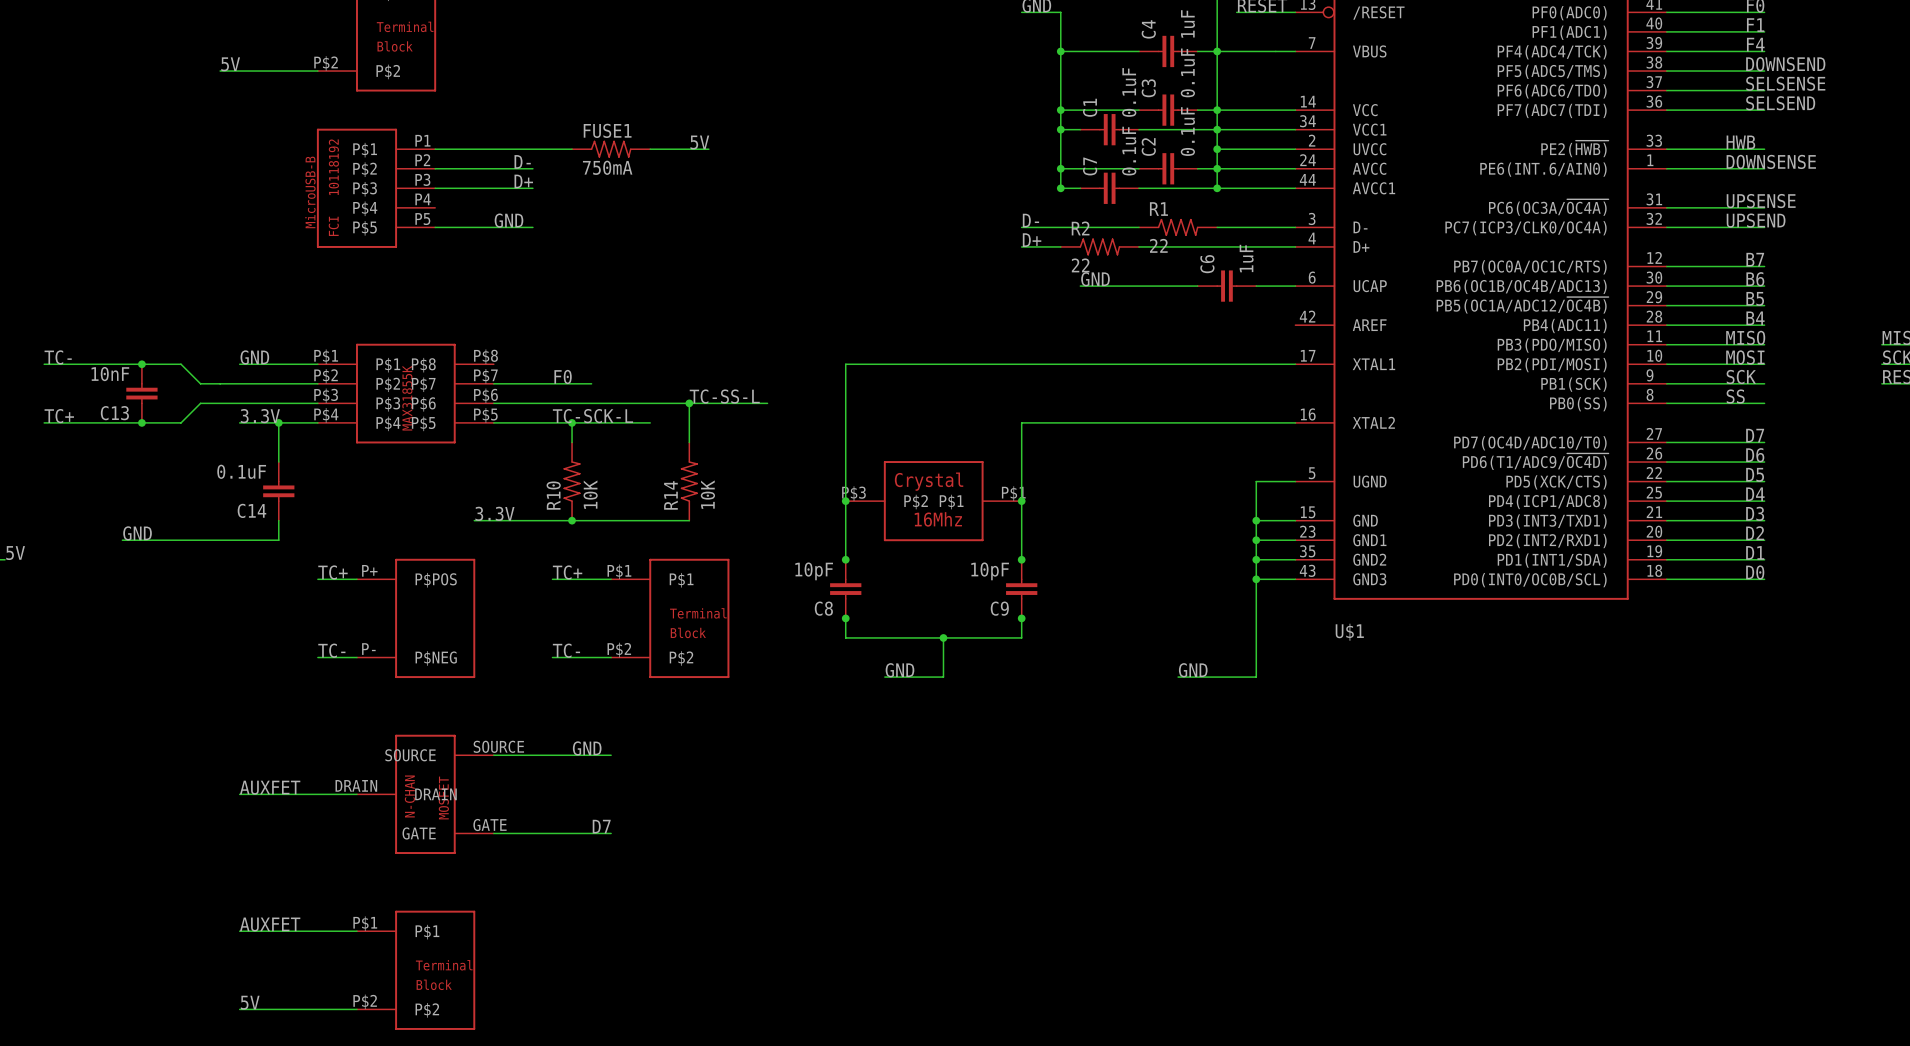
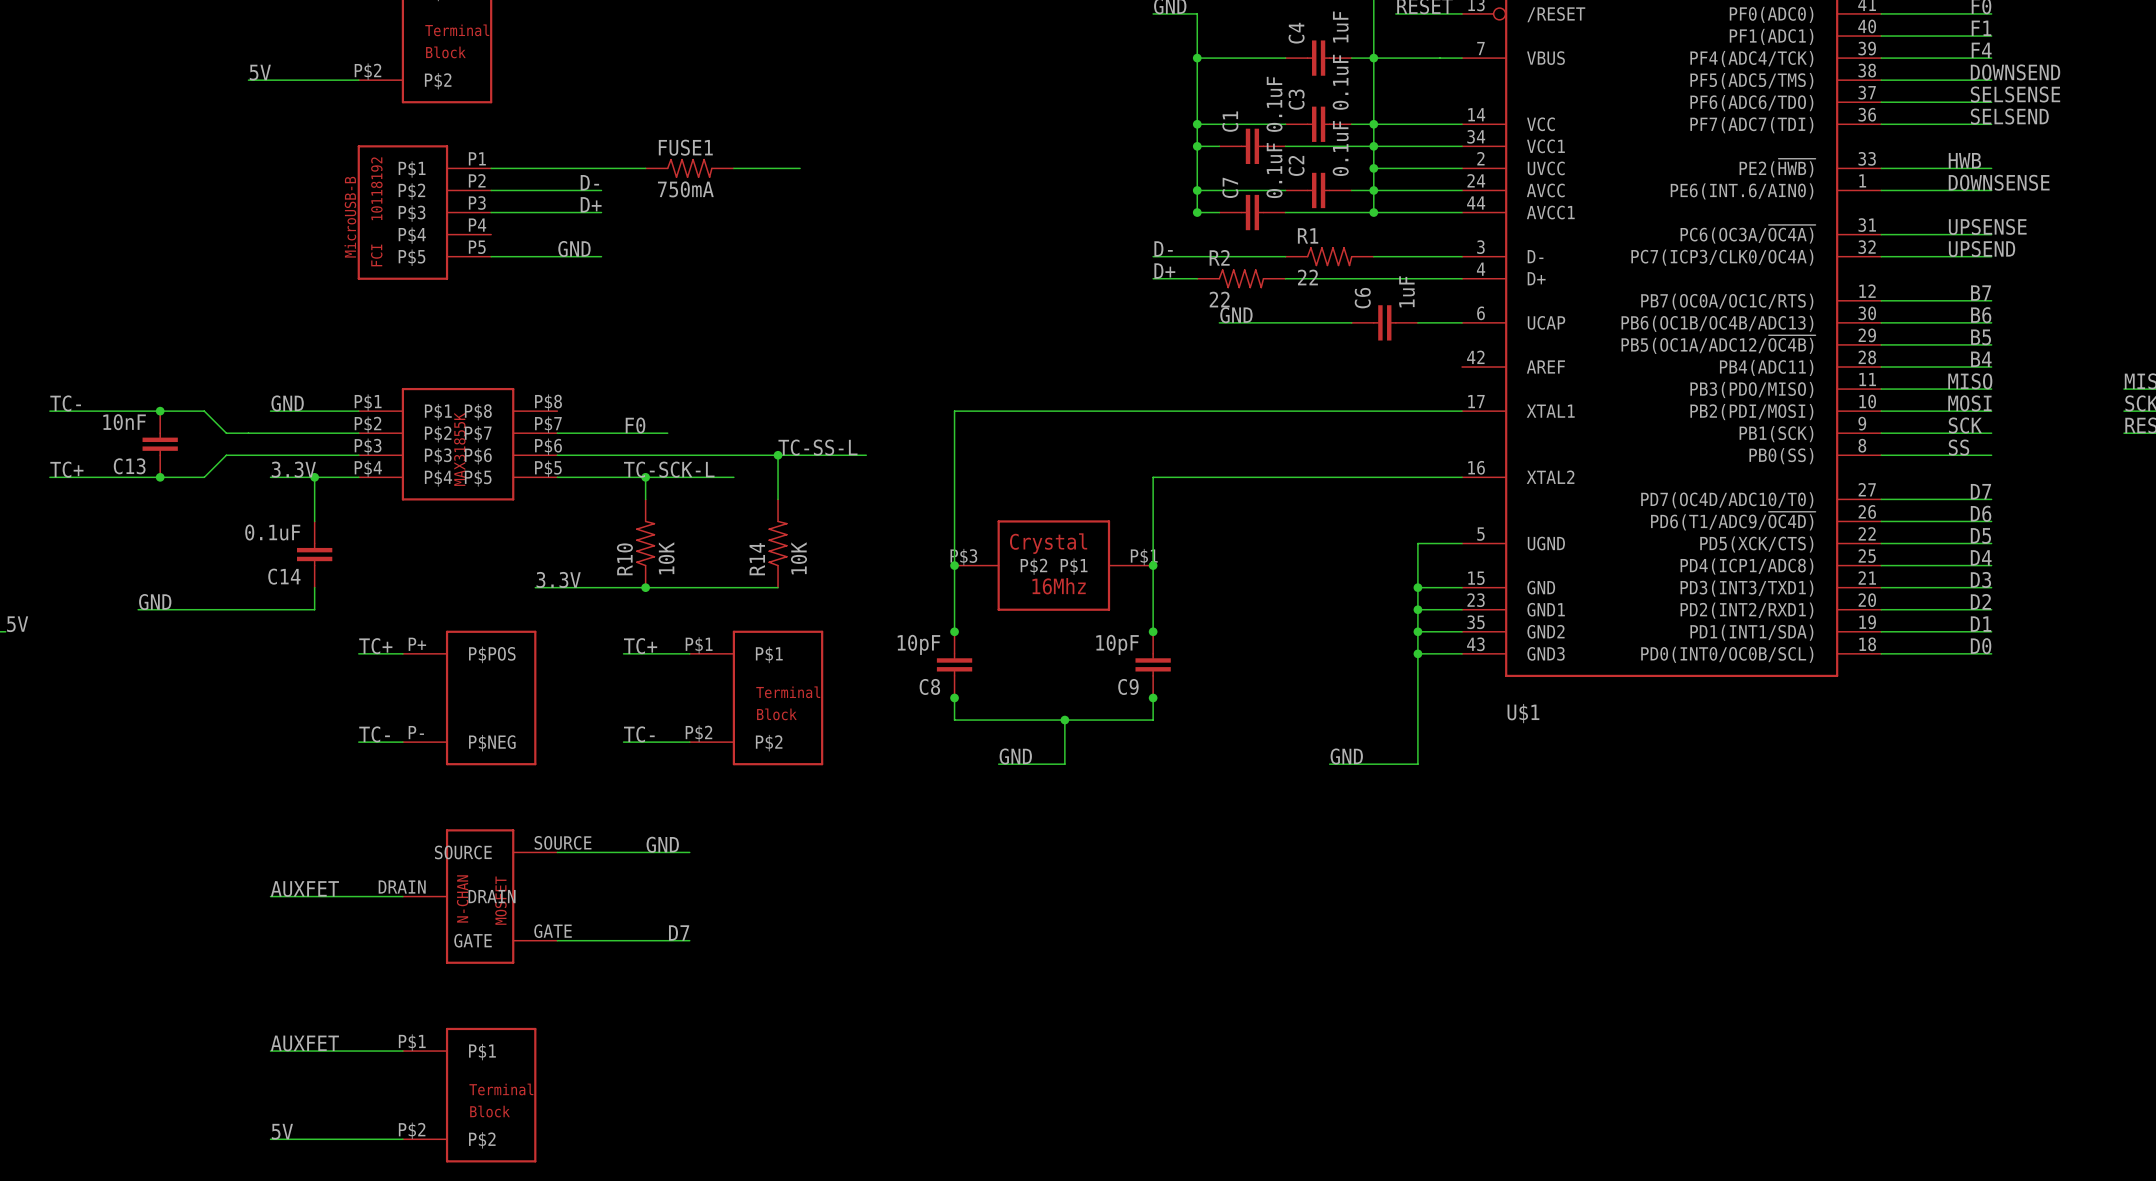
label: 5V (699, 142) -> none

